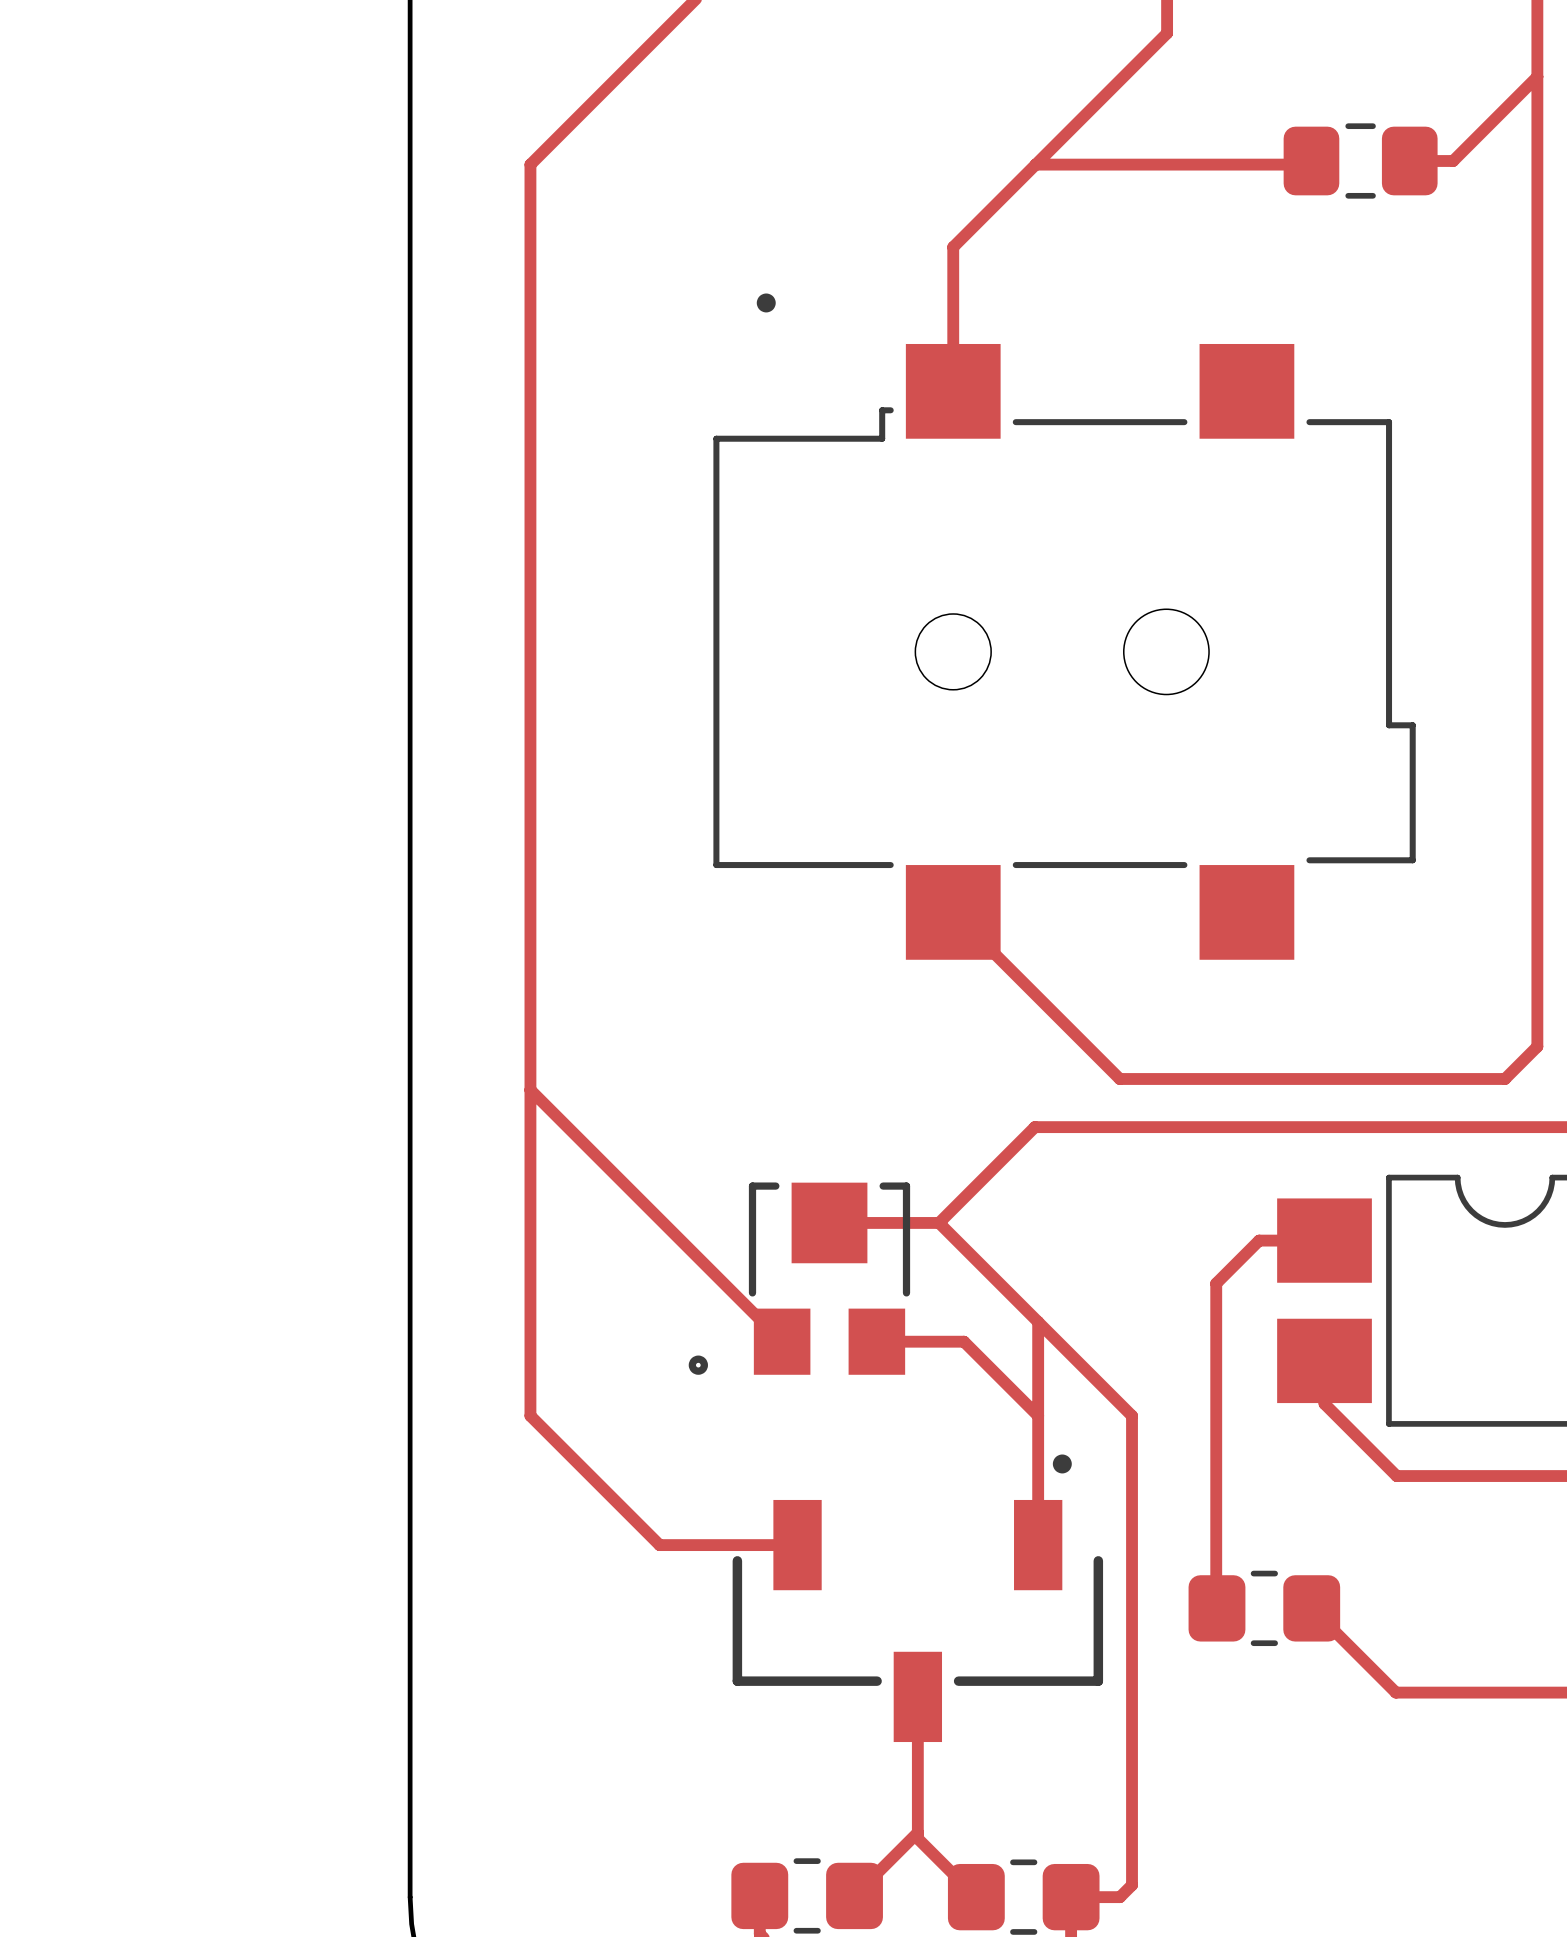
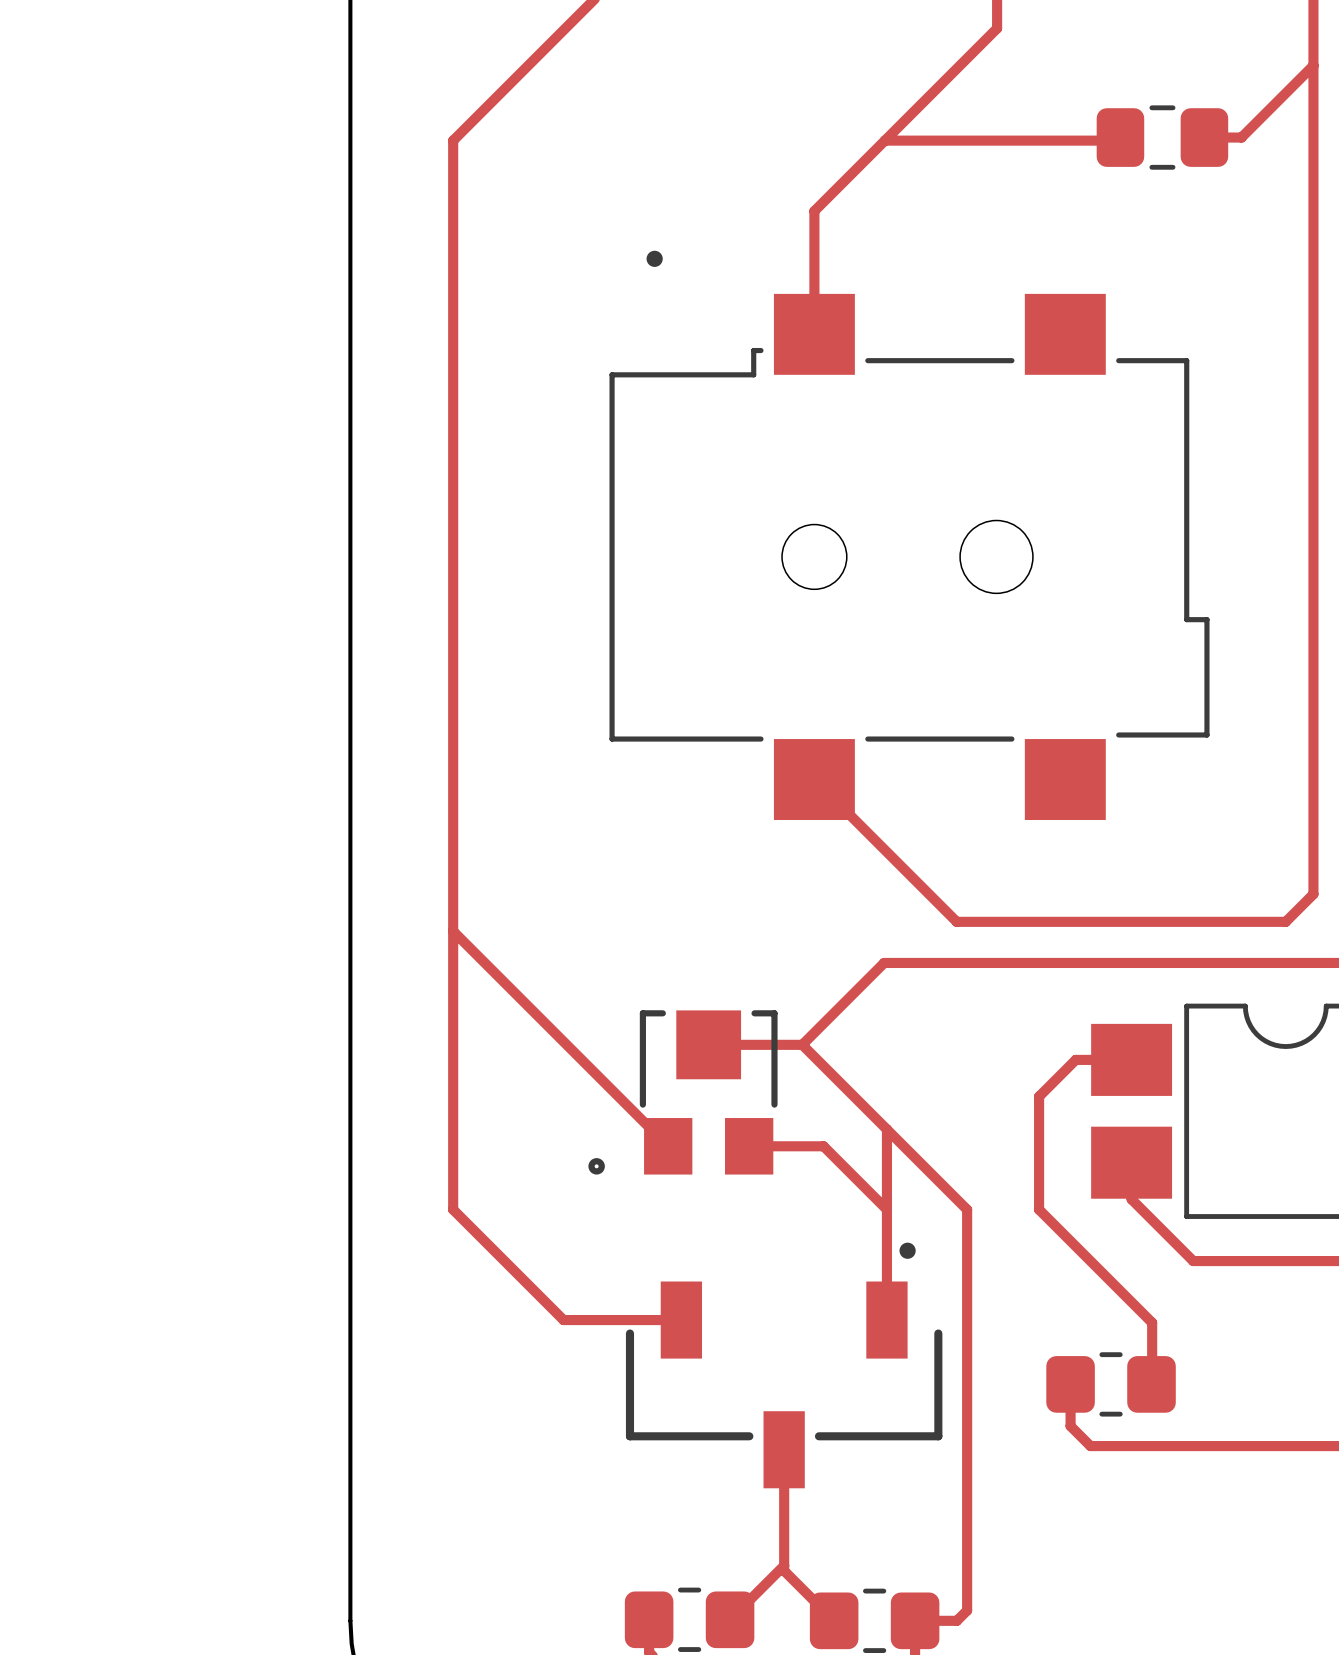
top track: (1216, 1415) (1216, 1608) -> (1039, 1209) (1152, 1322) (1151, 1384)
part position: (1264, 1608) -> (1111, 1384)
top track: (1311, 1608) (1395, 1692) -> (1070, 1384) (1070, 1426) (1090, 1446) (1192, 1446)

